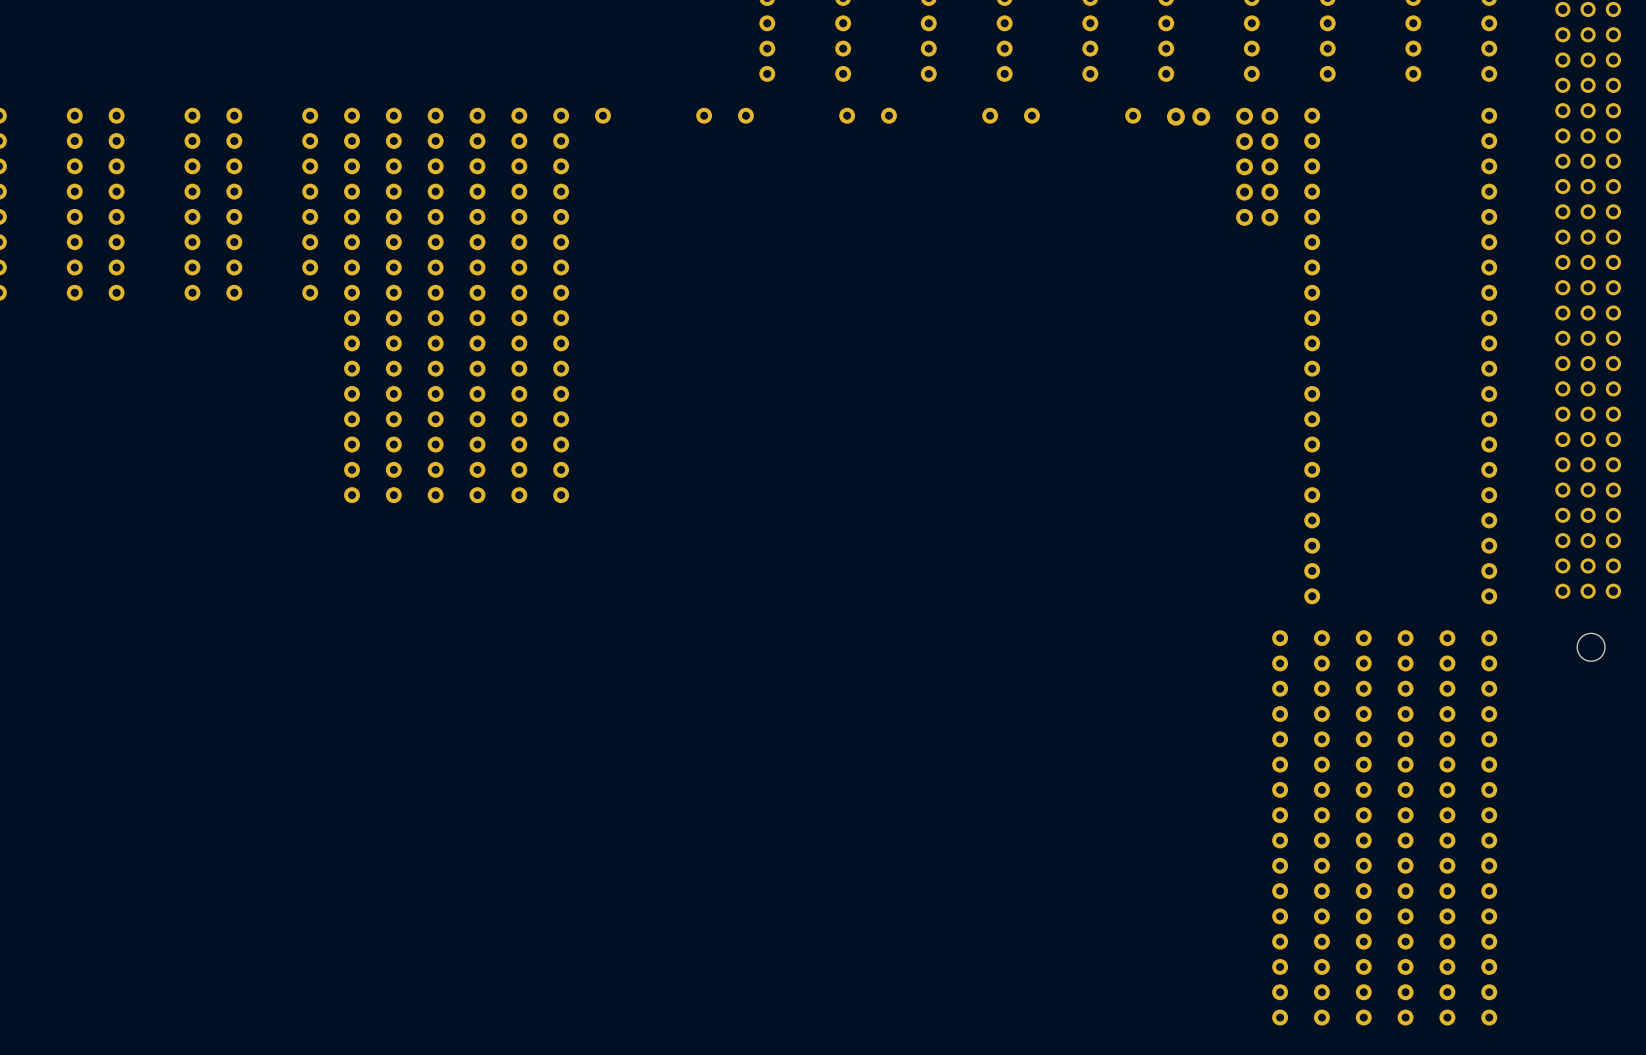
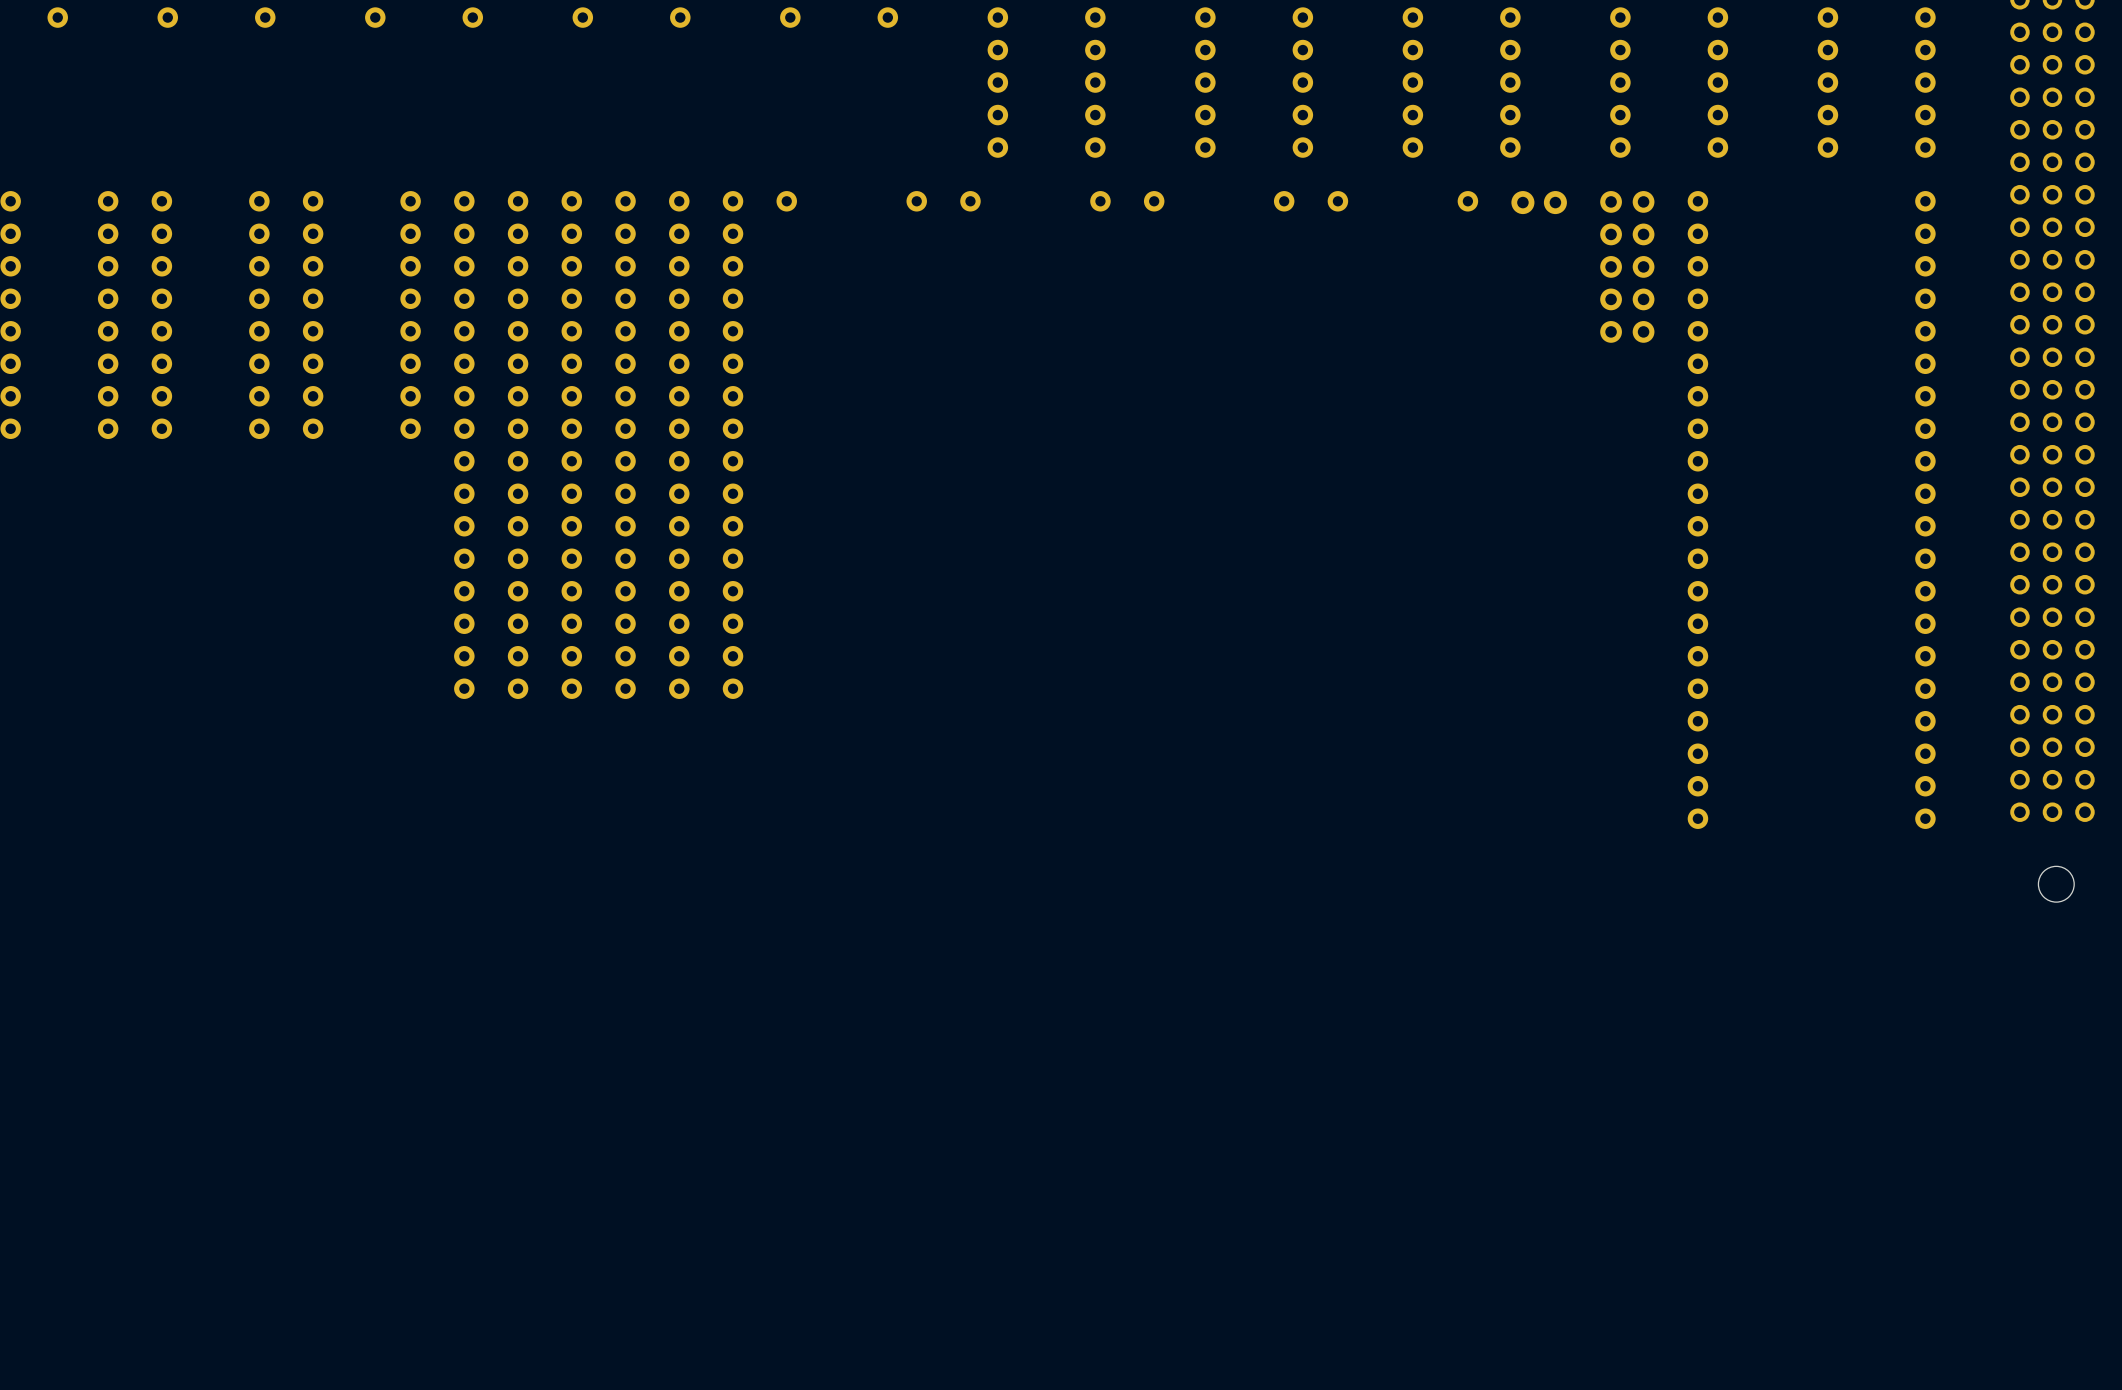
part: (1280, 827) -> none
part: (1321, 827) -> none
part: (1363, 827) -> none
part: (1405, 827) -> none
part: (1447, 827) -> none
part: (1489, 827) -> none

